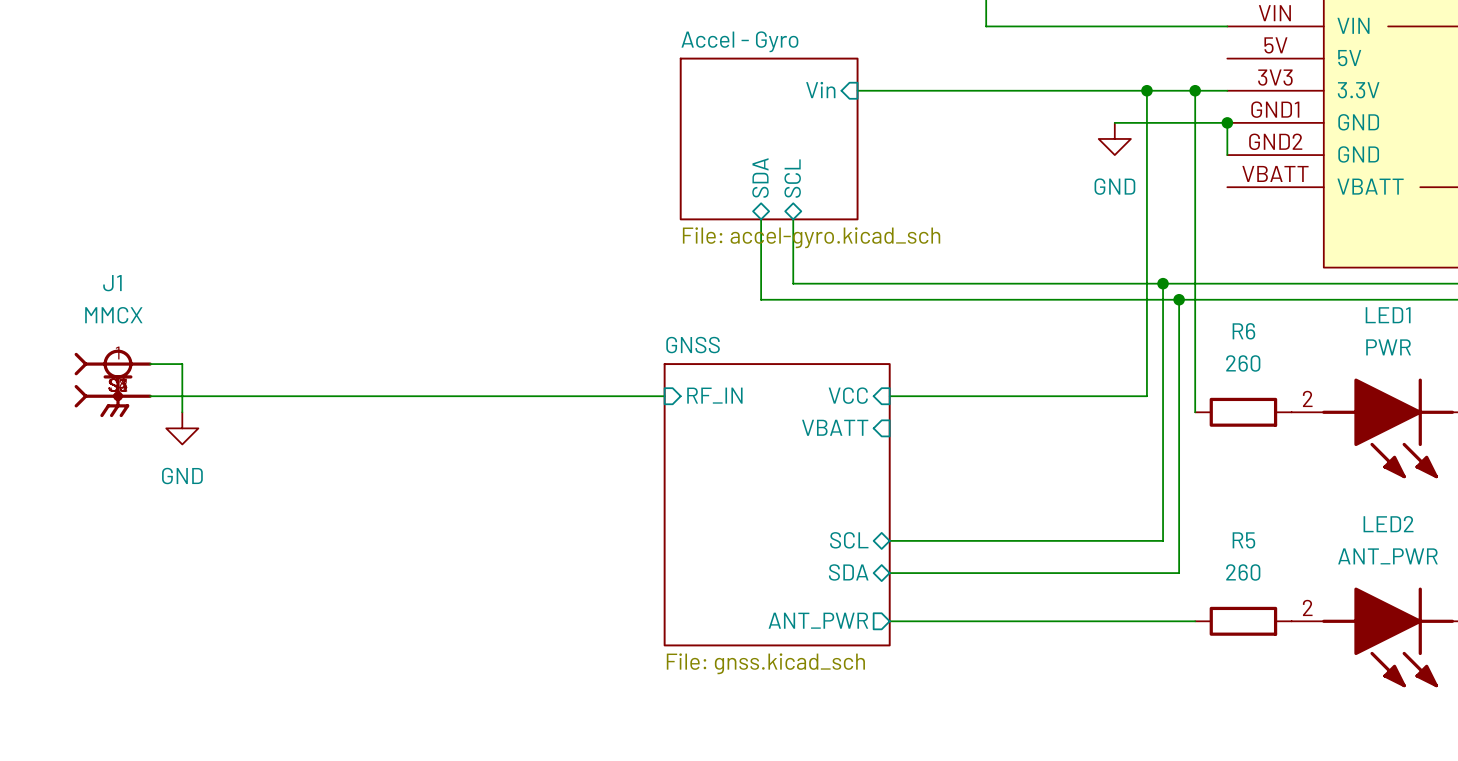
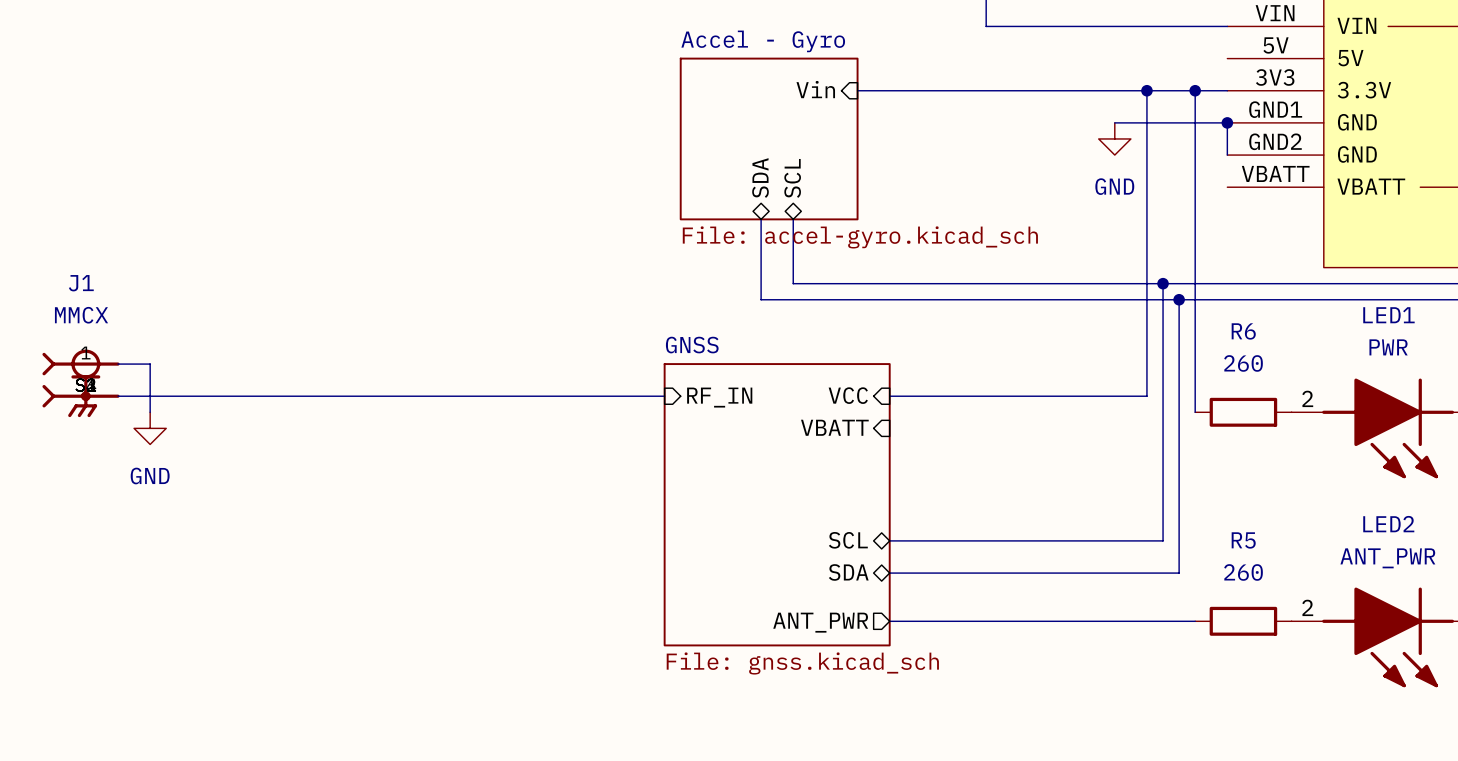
wire: (150, 364) (182, 364) (182, 412) -> (118, 364) (150, 364) (150, 412)
J1 position: (113, 383) -> (81, 383)
power symbol position: GND (182, 428) -> GND (150, 428)

